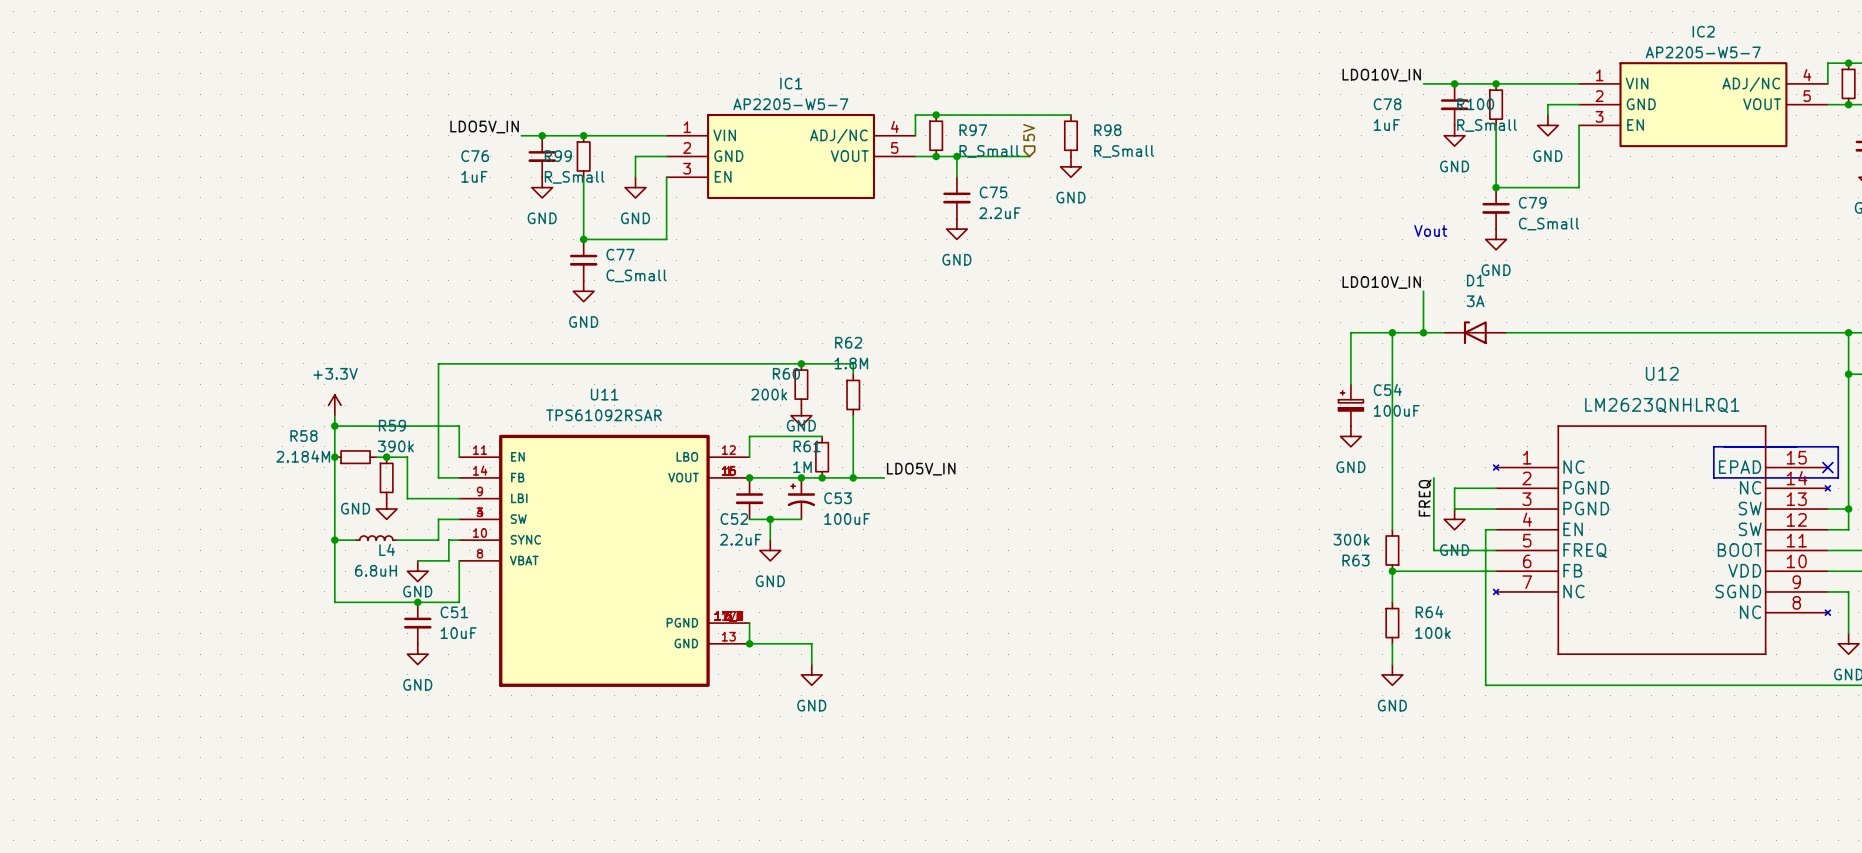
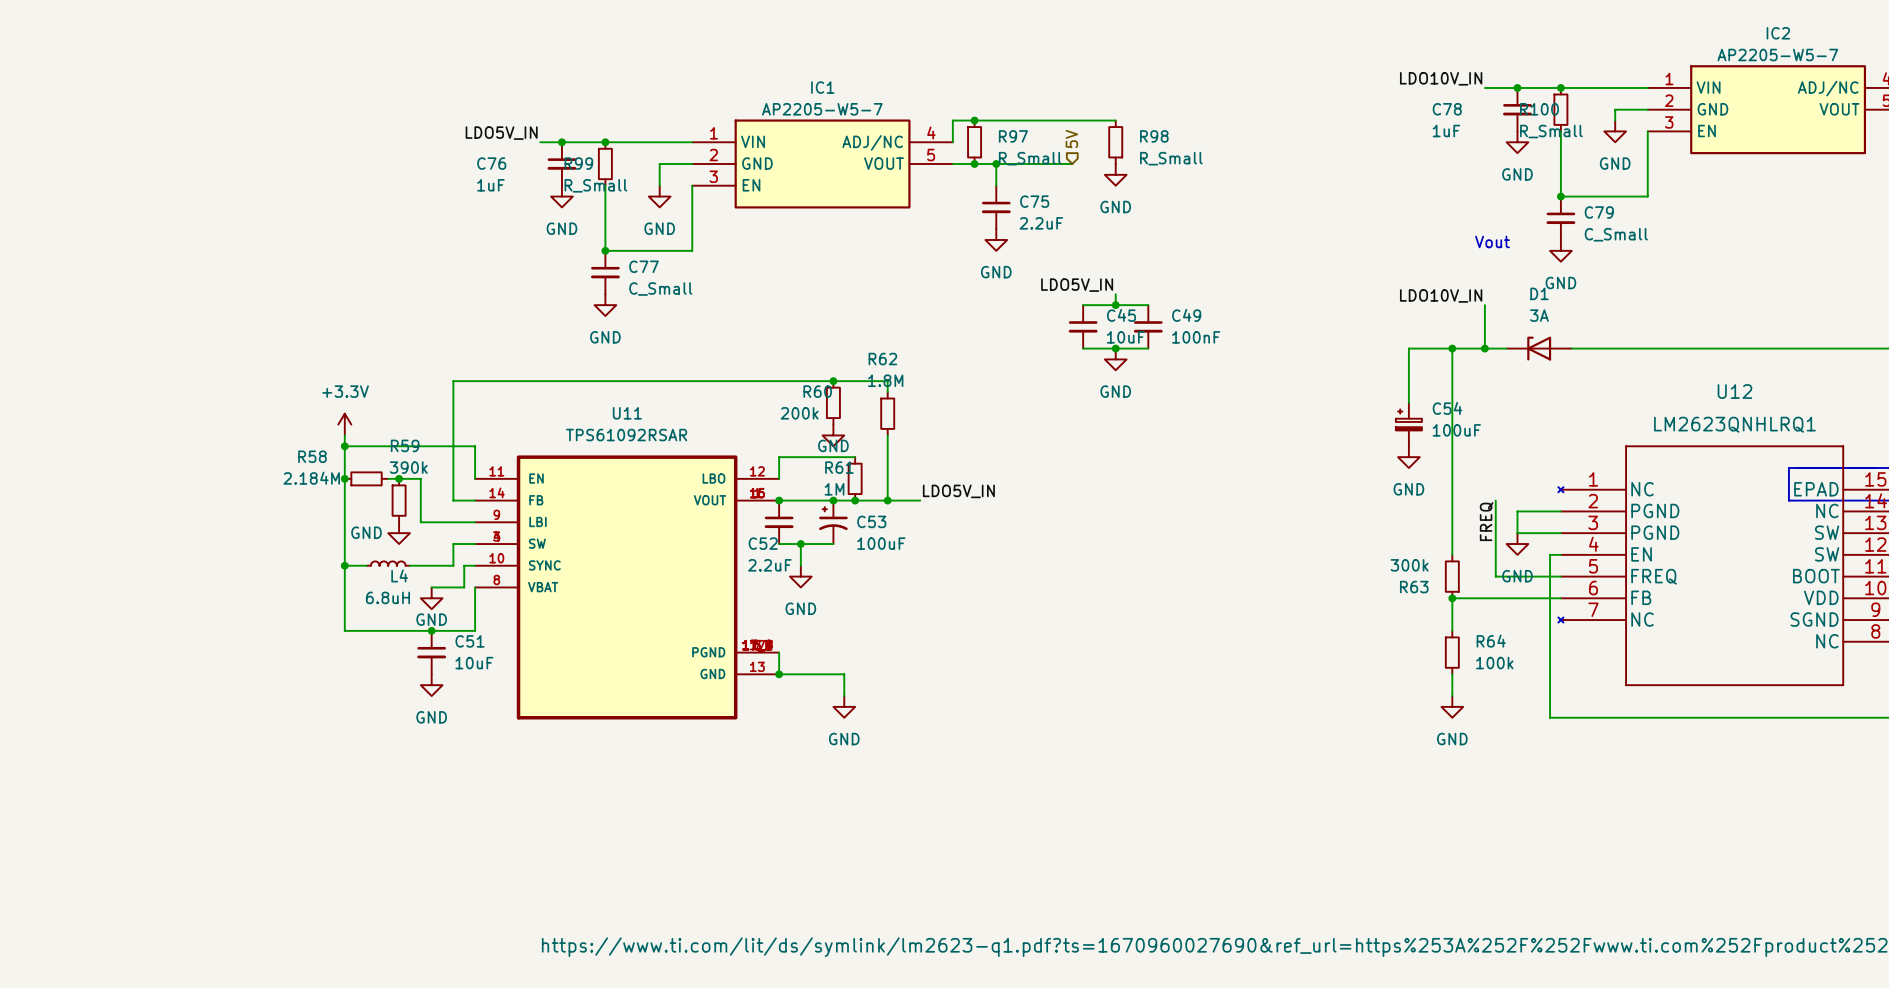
label: none -> LDO5V_IN (1077, 285)
wire: none -> (1115, 294) (1115, 305)
wire: none -> (1083, 305) (1148, 305)
junction: none -> (1115, 305)
C45: none -> 10uF (1083, 326)
C49: none -> 100nF (1148, 326)
wire: none -> (1083, 348) (1148, 348)
junction: none -> (1115, 348)
power symbol: none -> GND (1115, 359)

